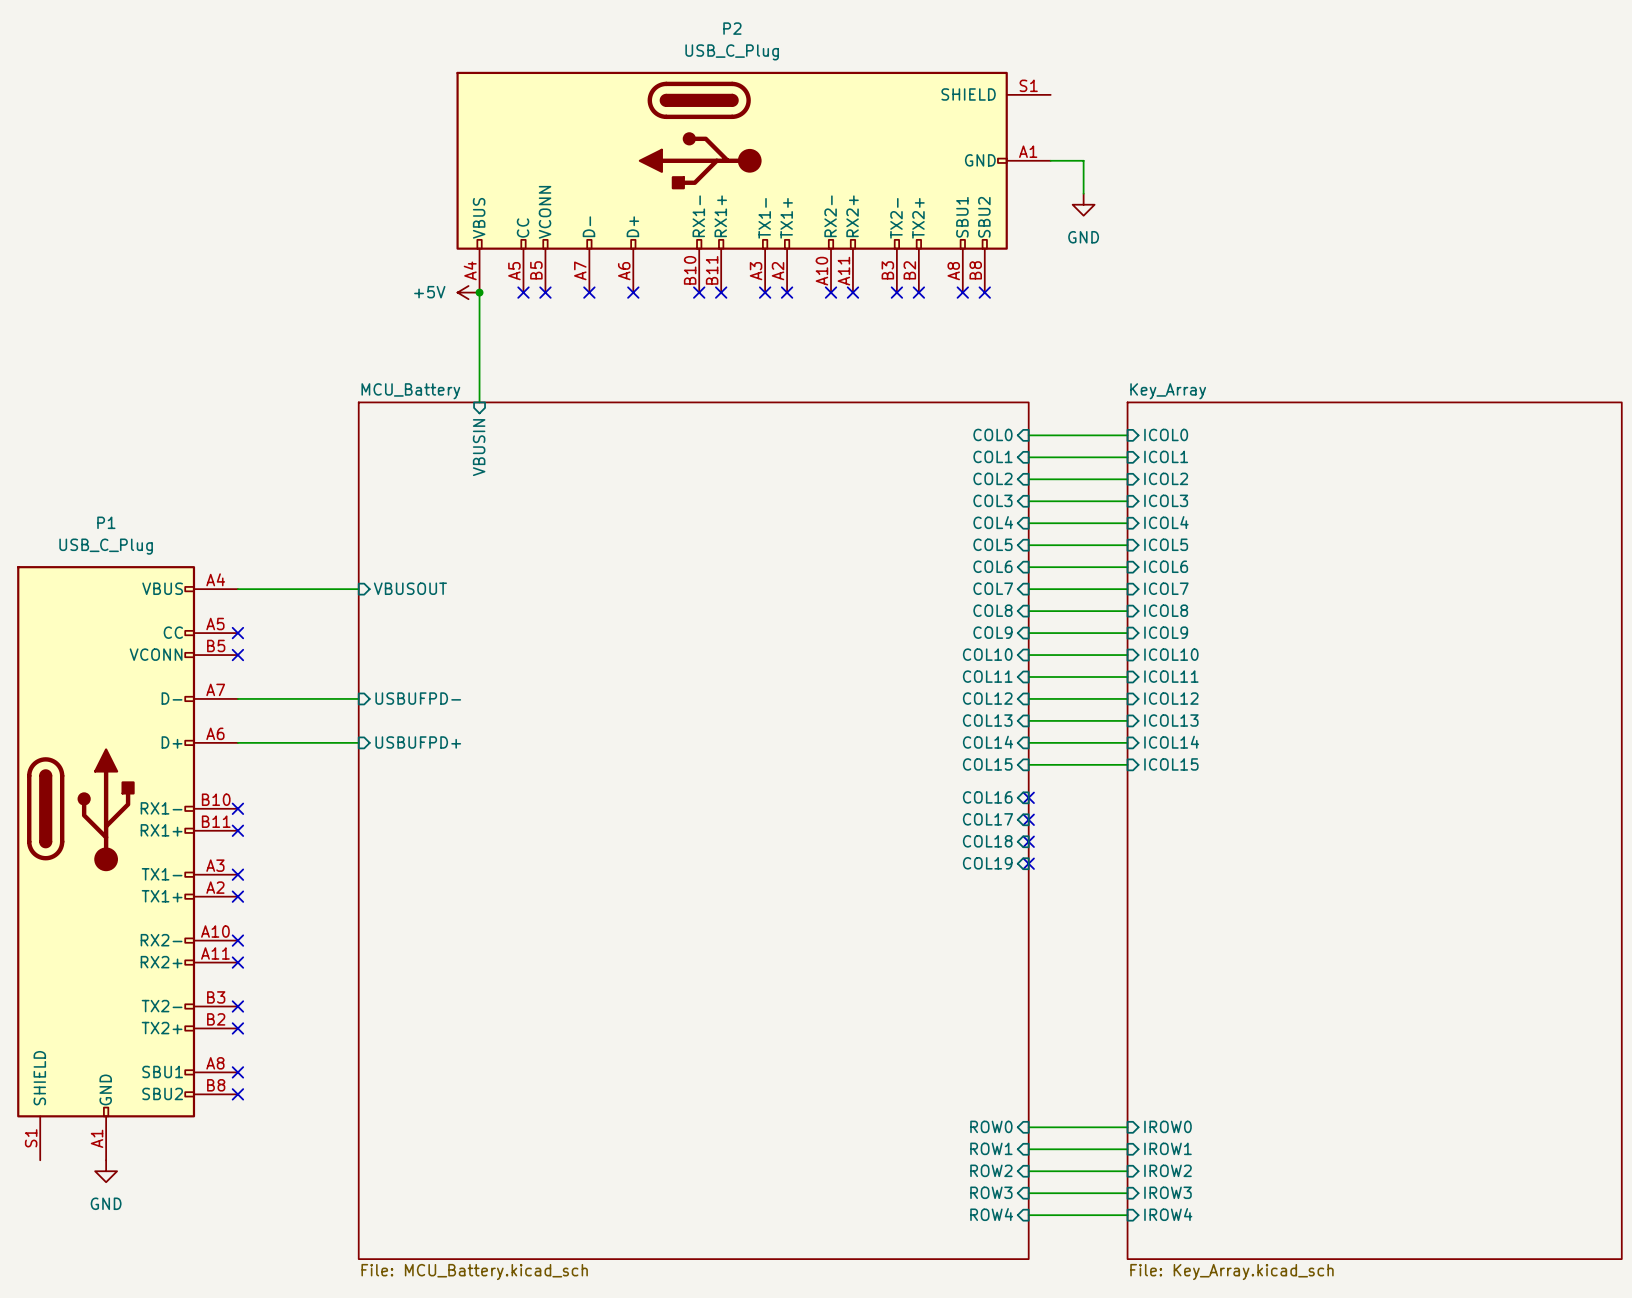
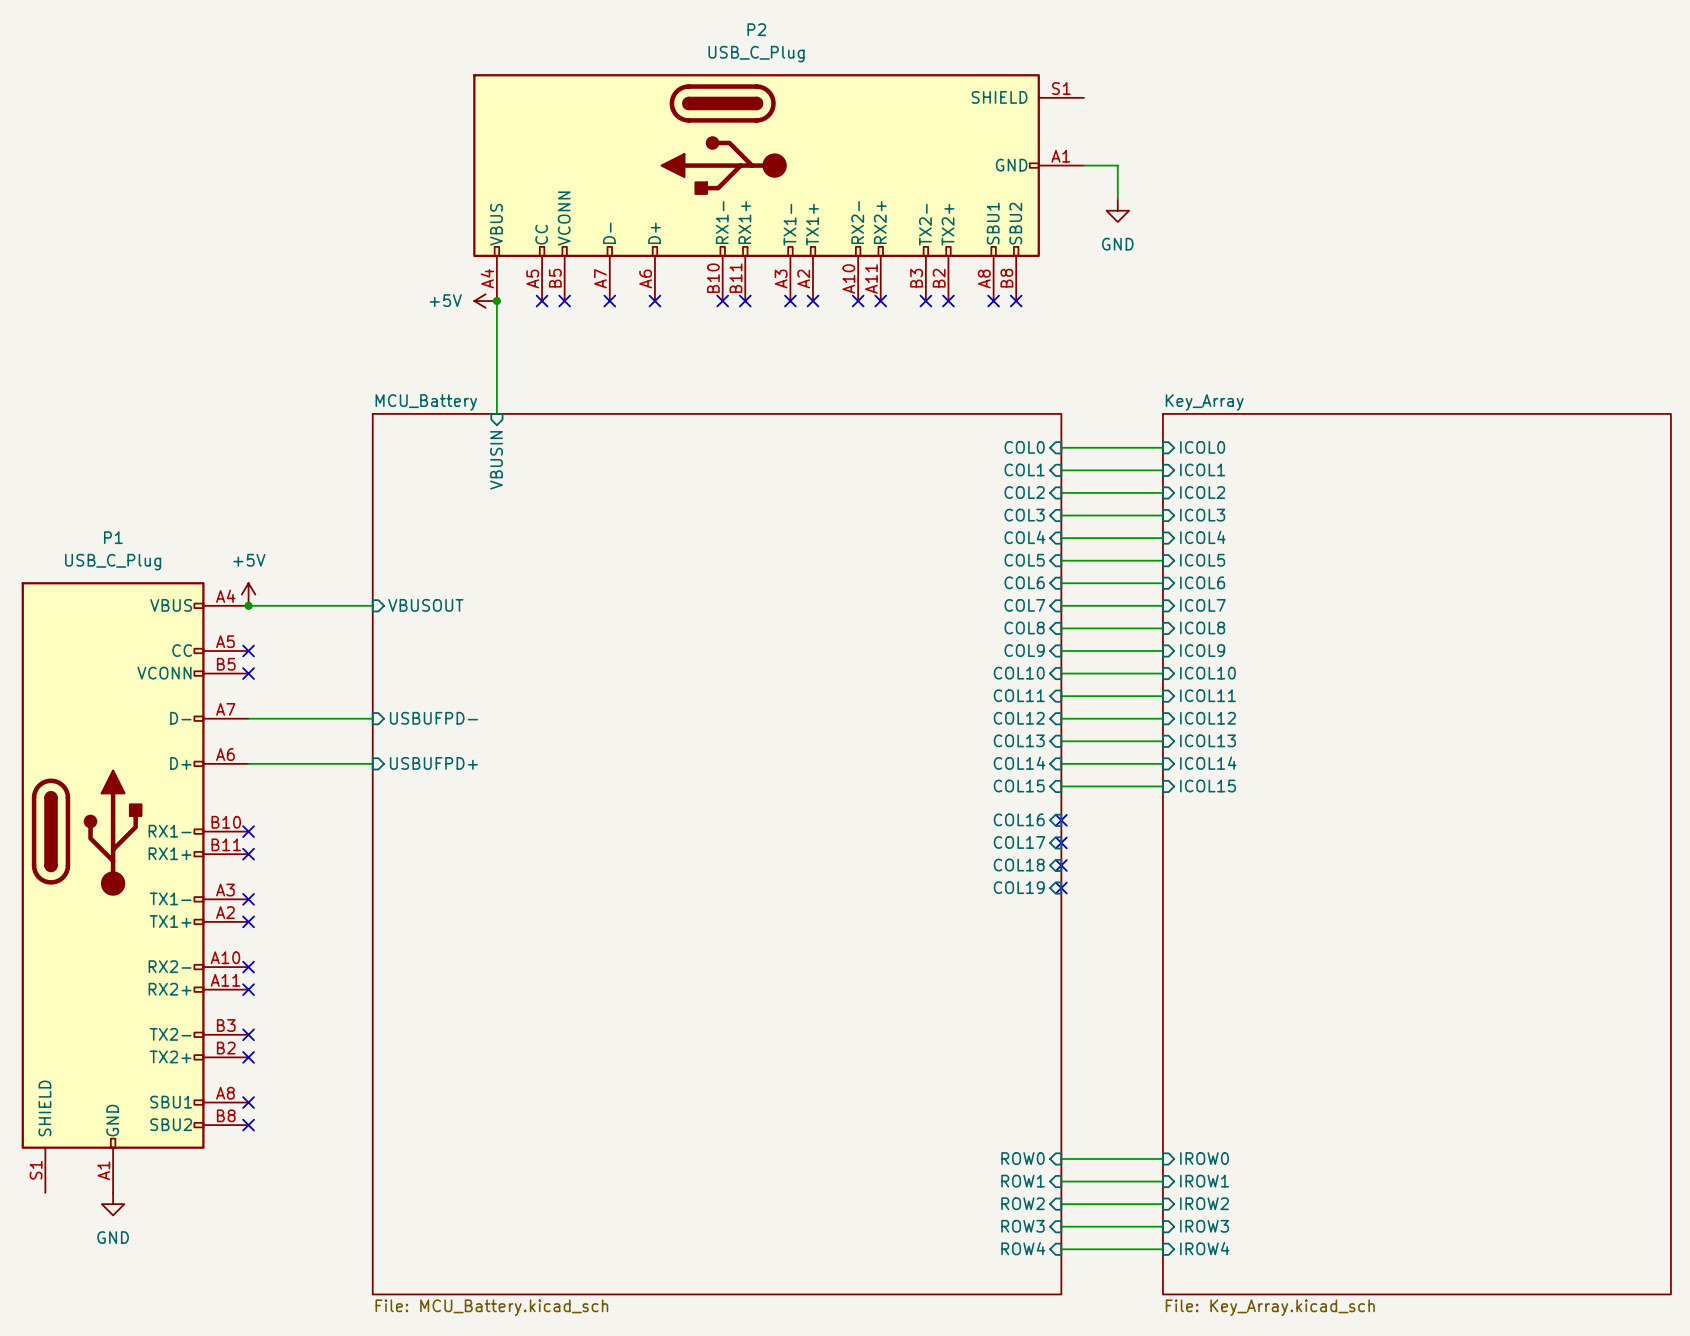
power symbol: none -> +5V (248, 594)
junction: none -> (248, 605)

